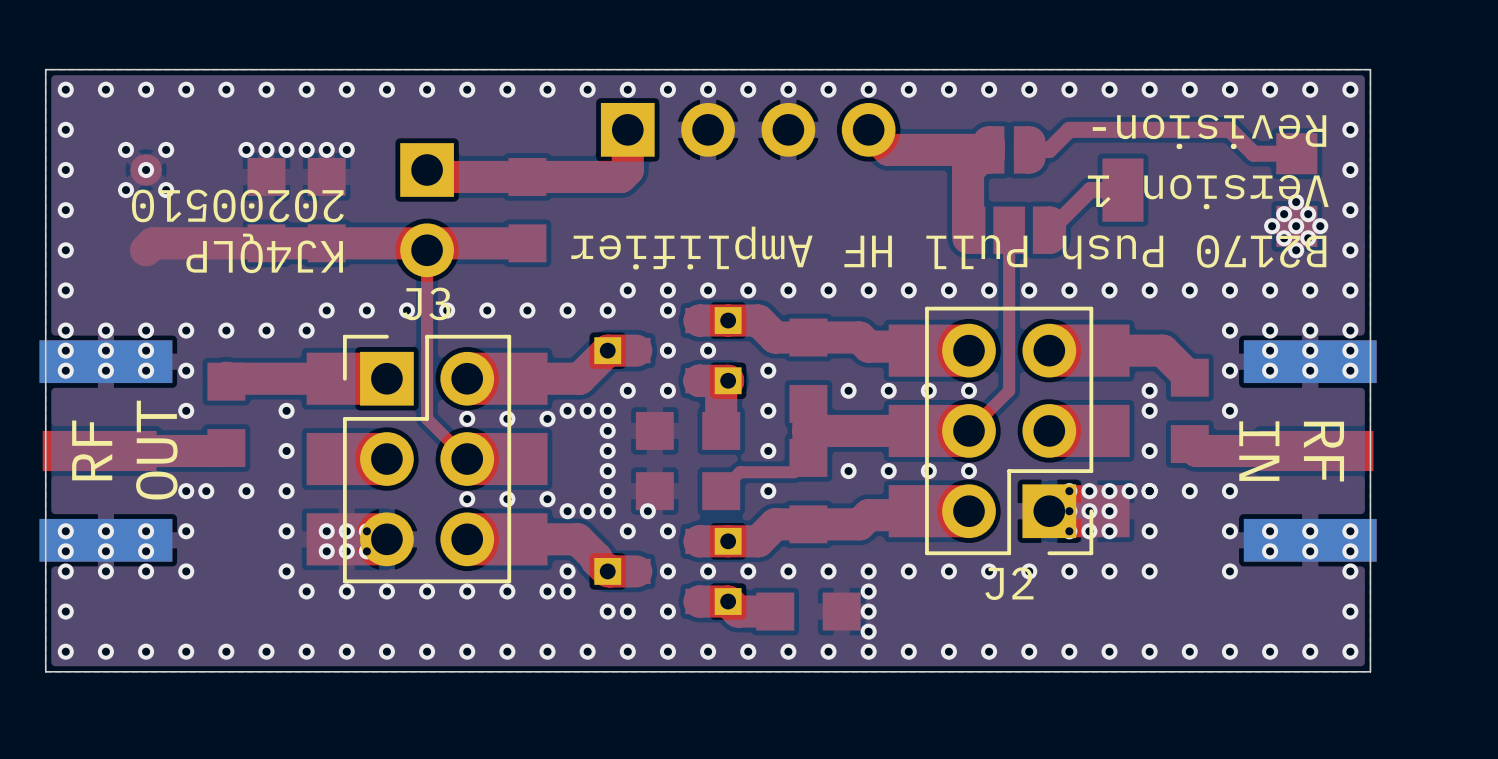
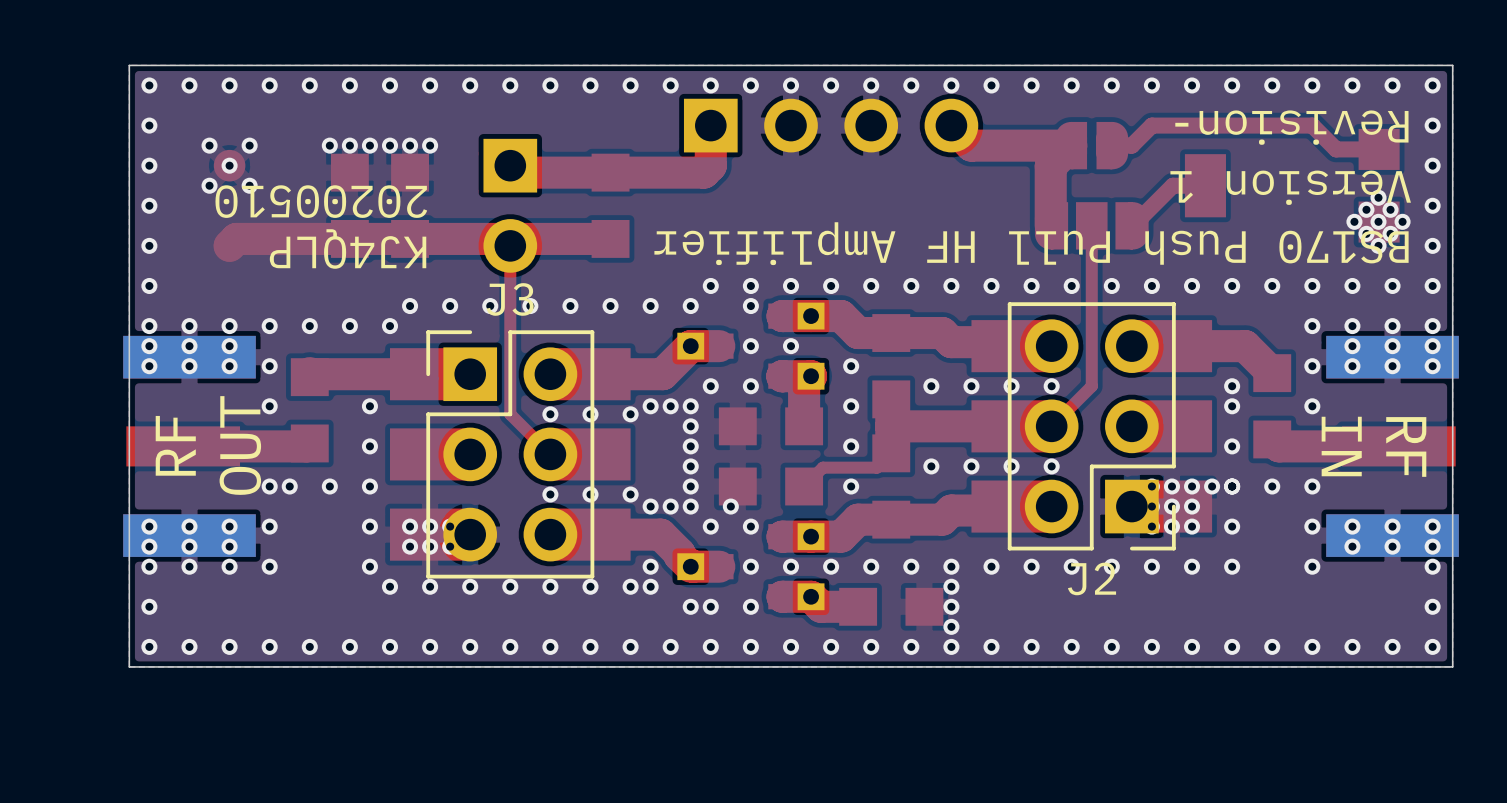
text: B2170 Push Pull HF Amplifier (948, 248) -> BS170 Push Pull HF Amplifier (1031, 243)

